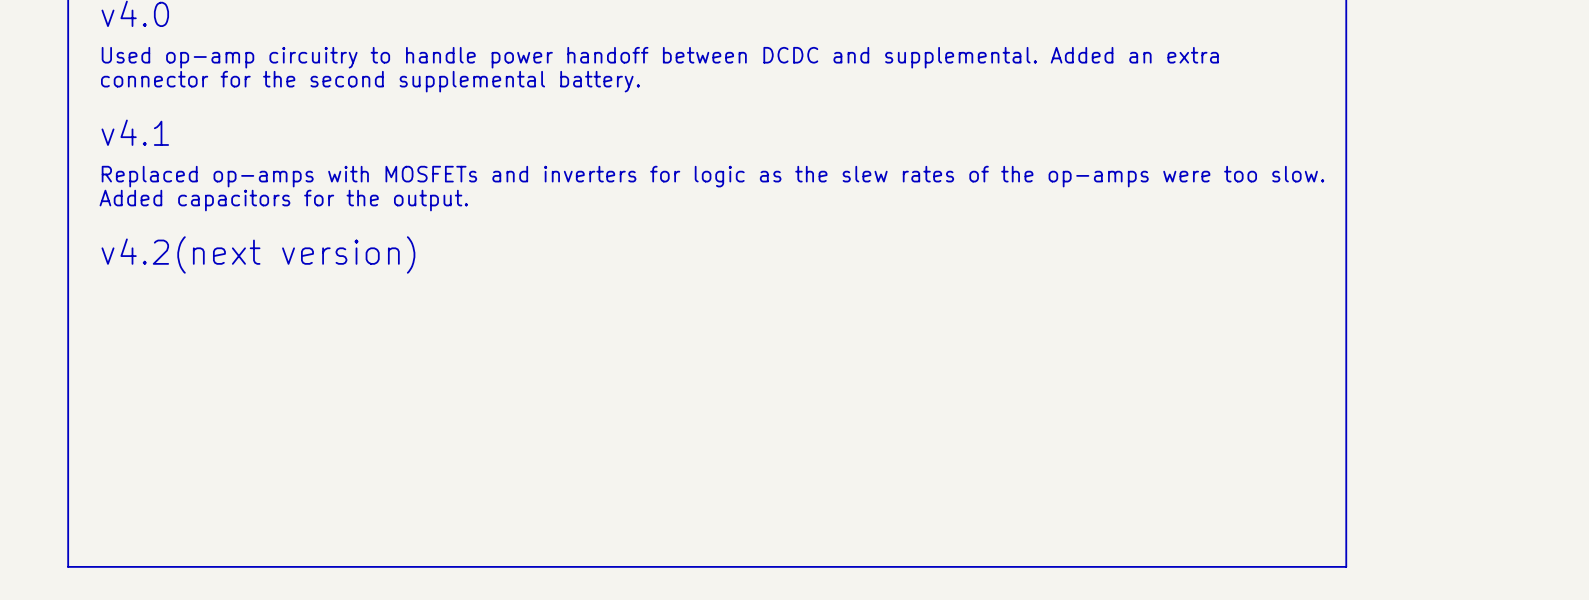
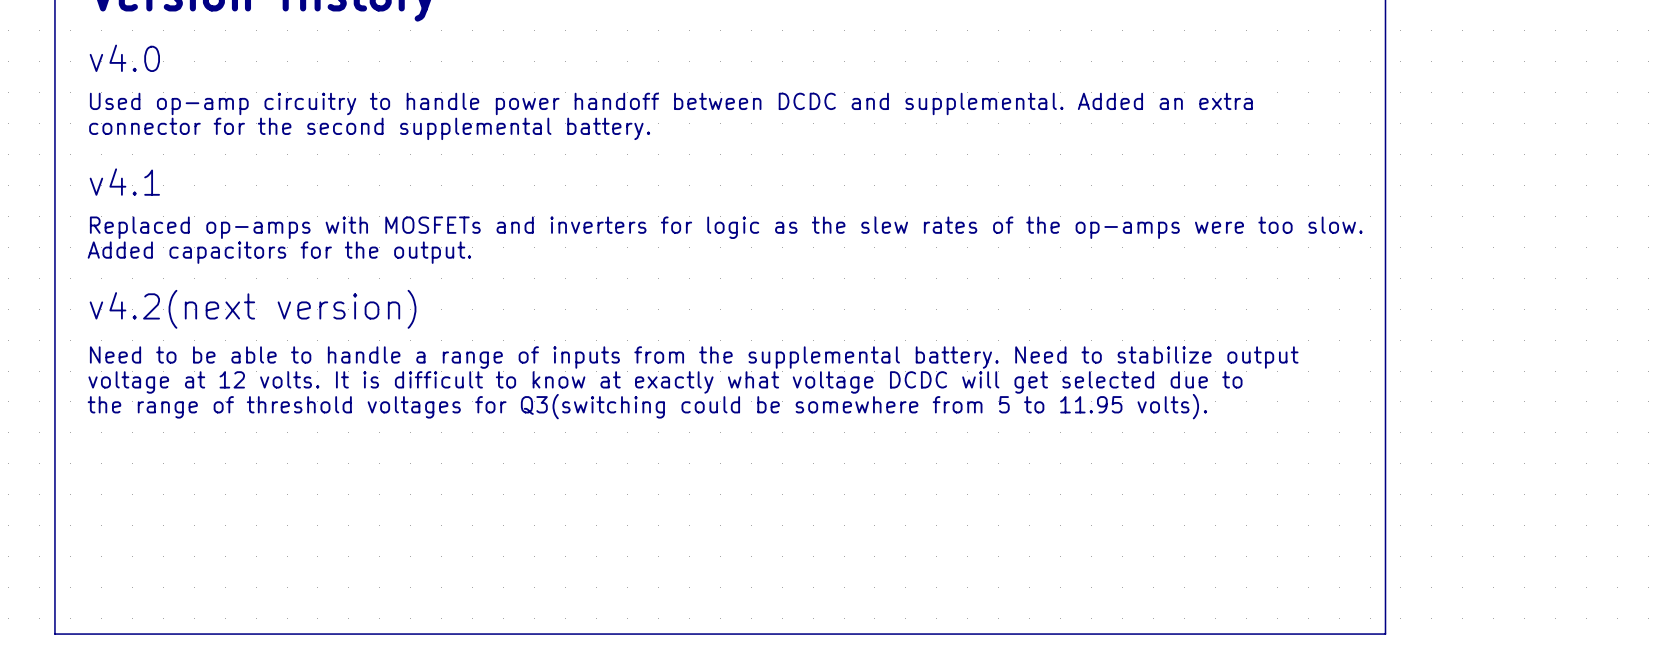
text: none -> Need to be able to handle a range of inputs from the supplemental battery. Need to stabilize output (694, 357)
text: none -> voltage at 12 volts. It is difficult to know at exactly what voltage DCDC will get selected due to (665, 382)
text: none -> the range of threshold voltages for Q3(switching could be somewhere from 5 to 11.95 volts). (647, 406)

